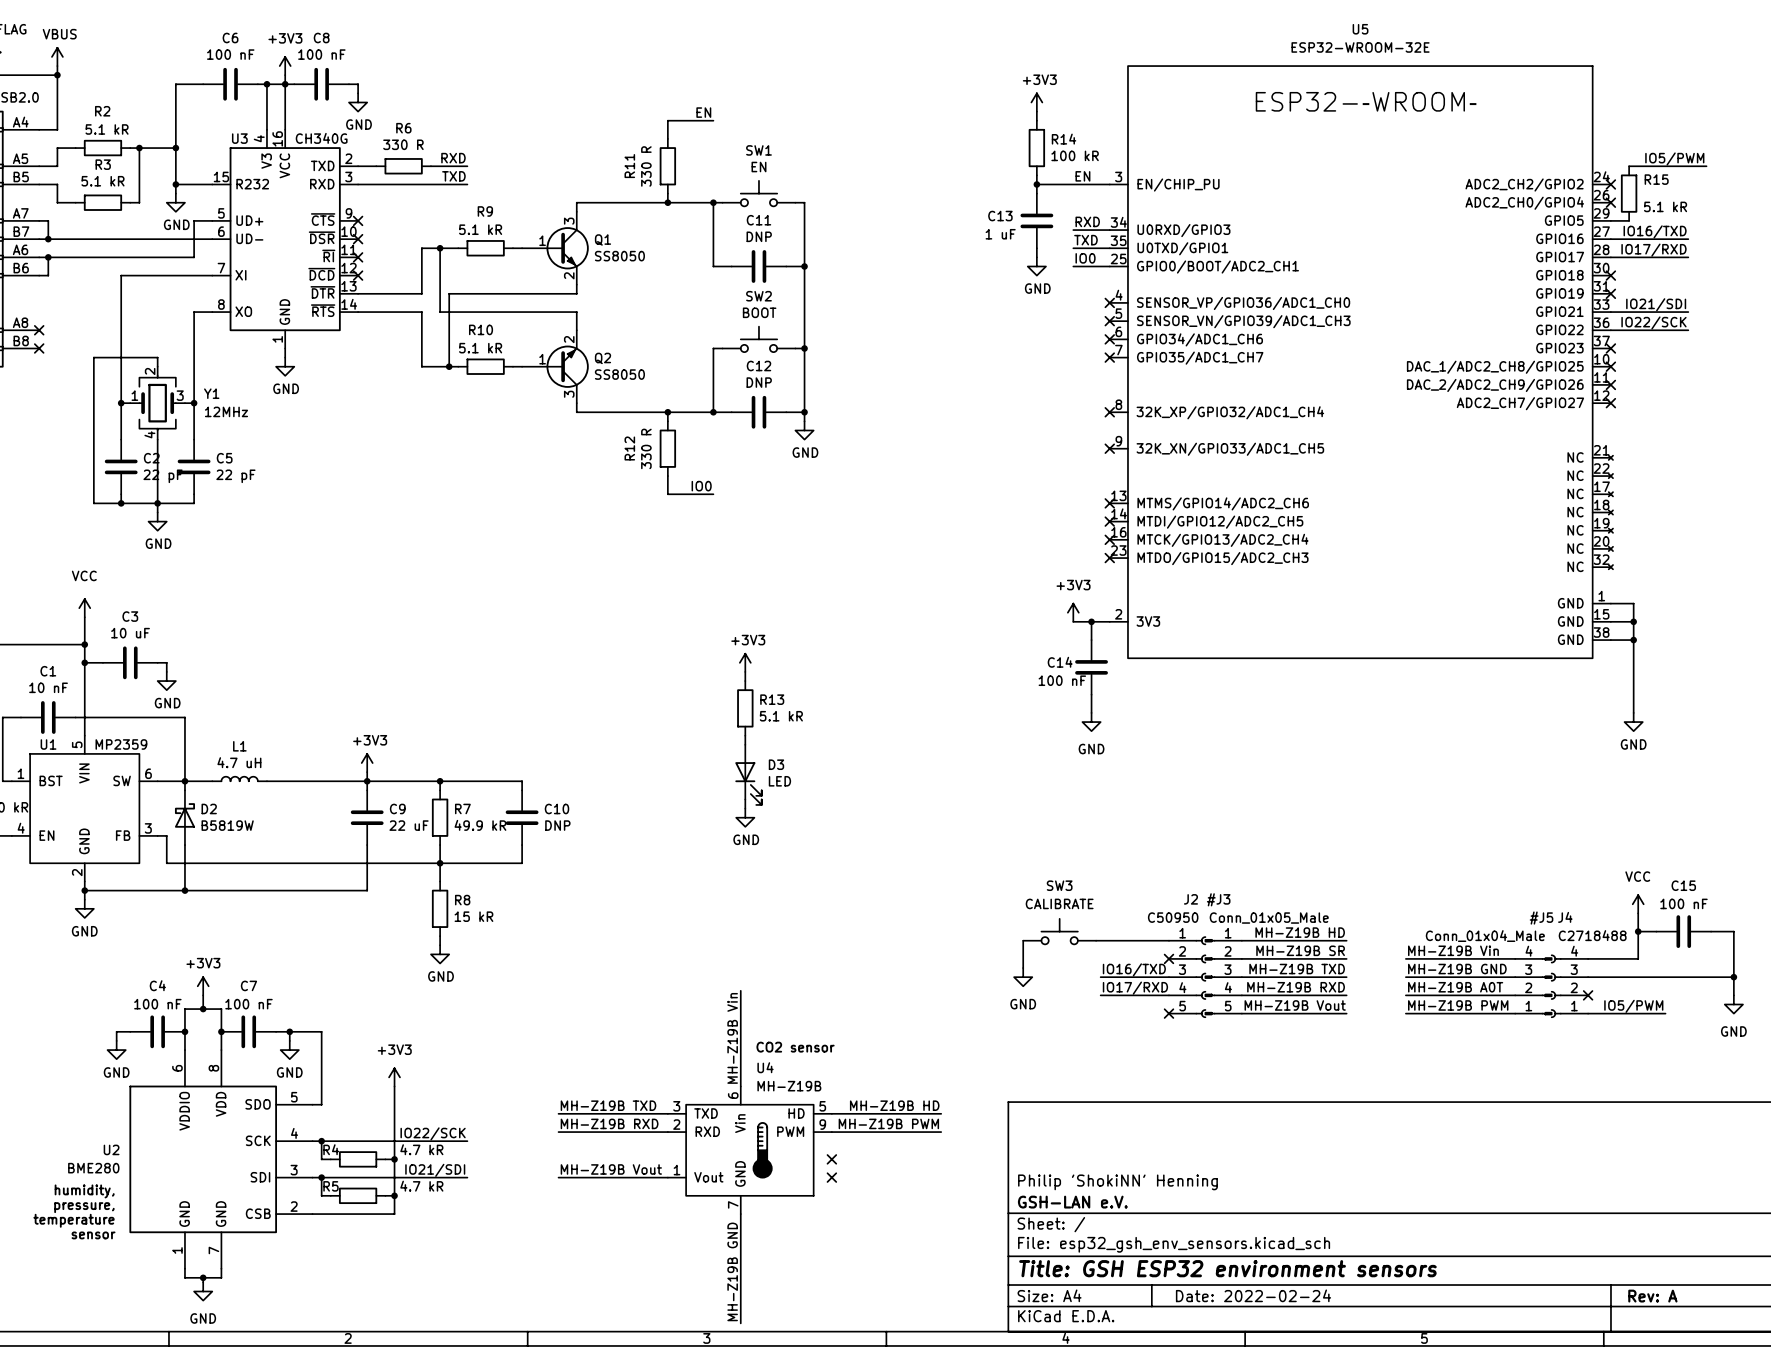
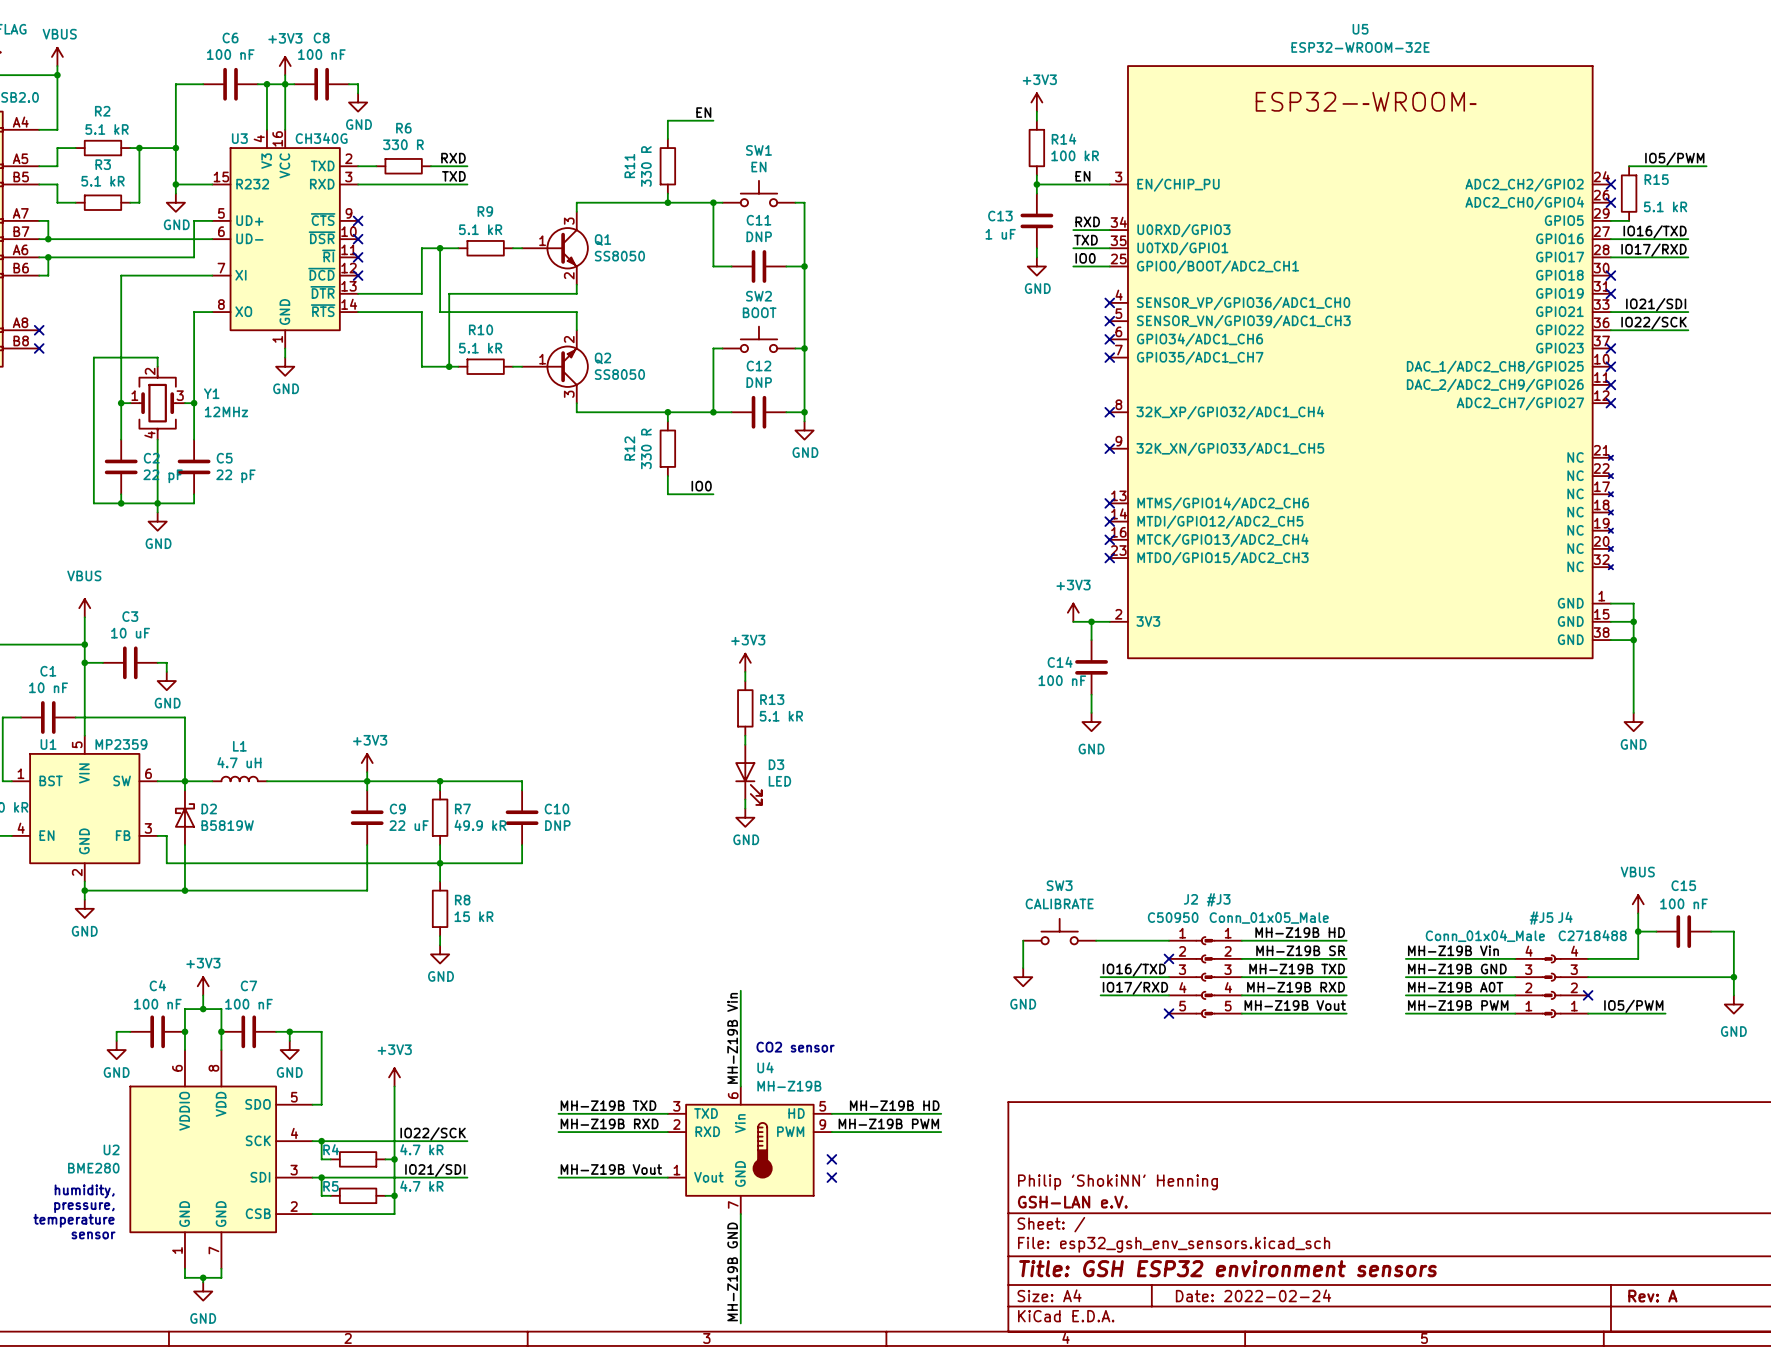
power symbol: VCC (84, 608) -> VBUS (84, 608)
power symbol: VCC (1638, 904) -> VBUS (1638, 904)

